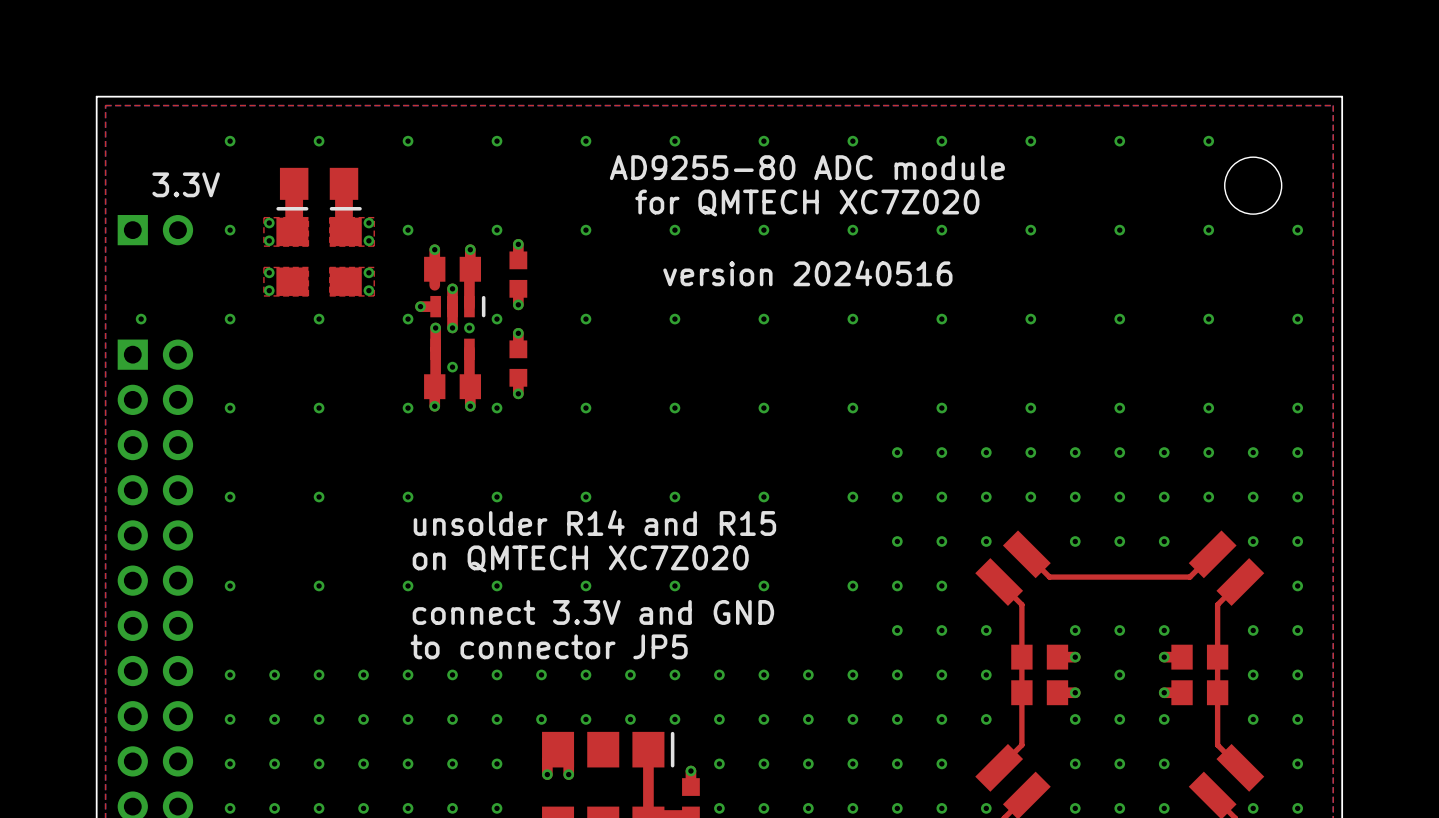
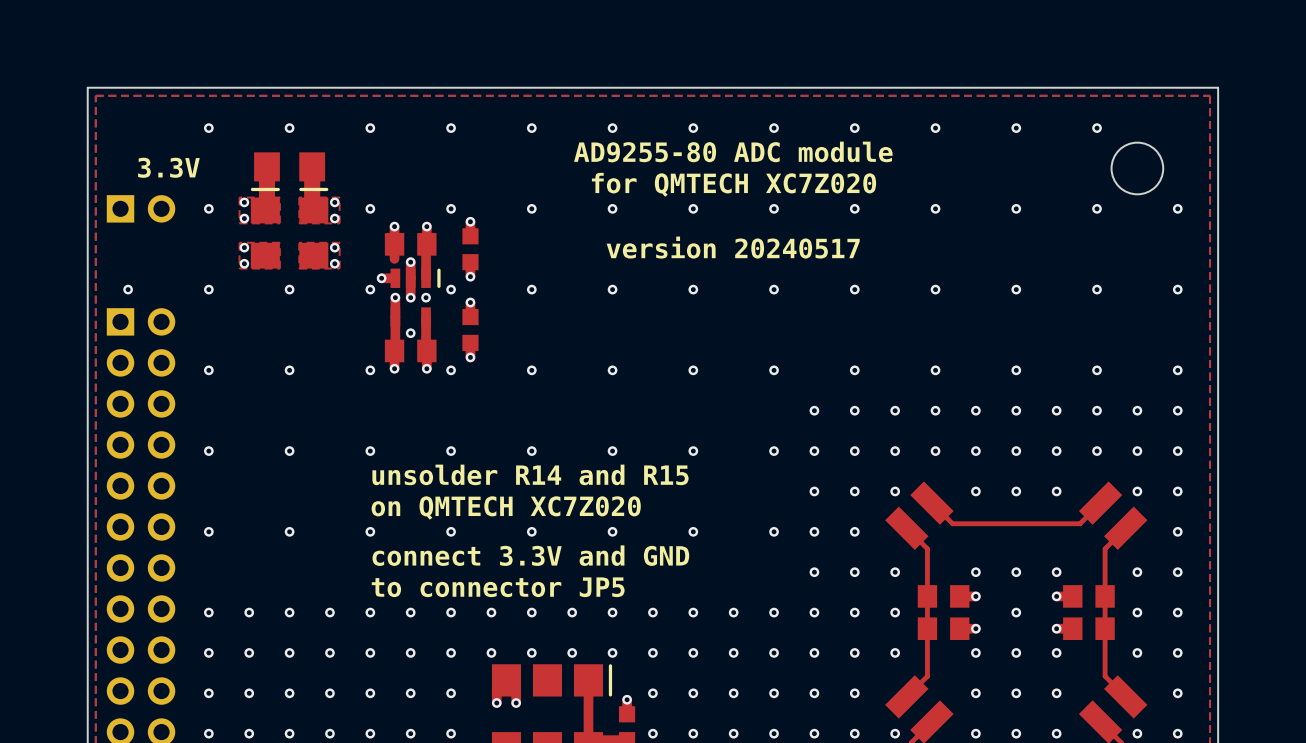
text: version 20240516 (807, 273) -> version 20240517 (733, 247)

